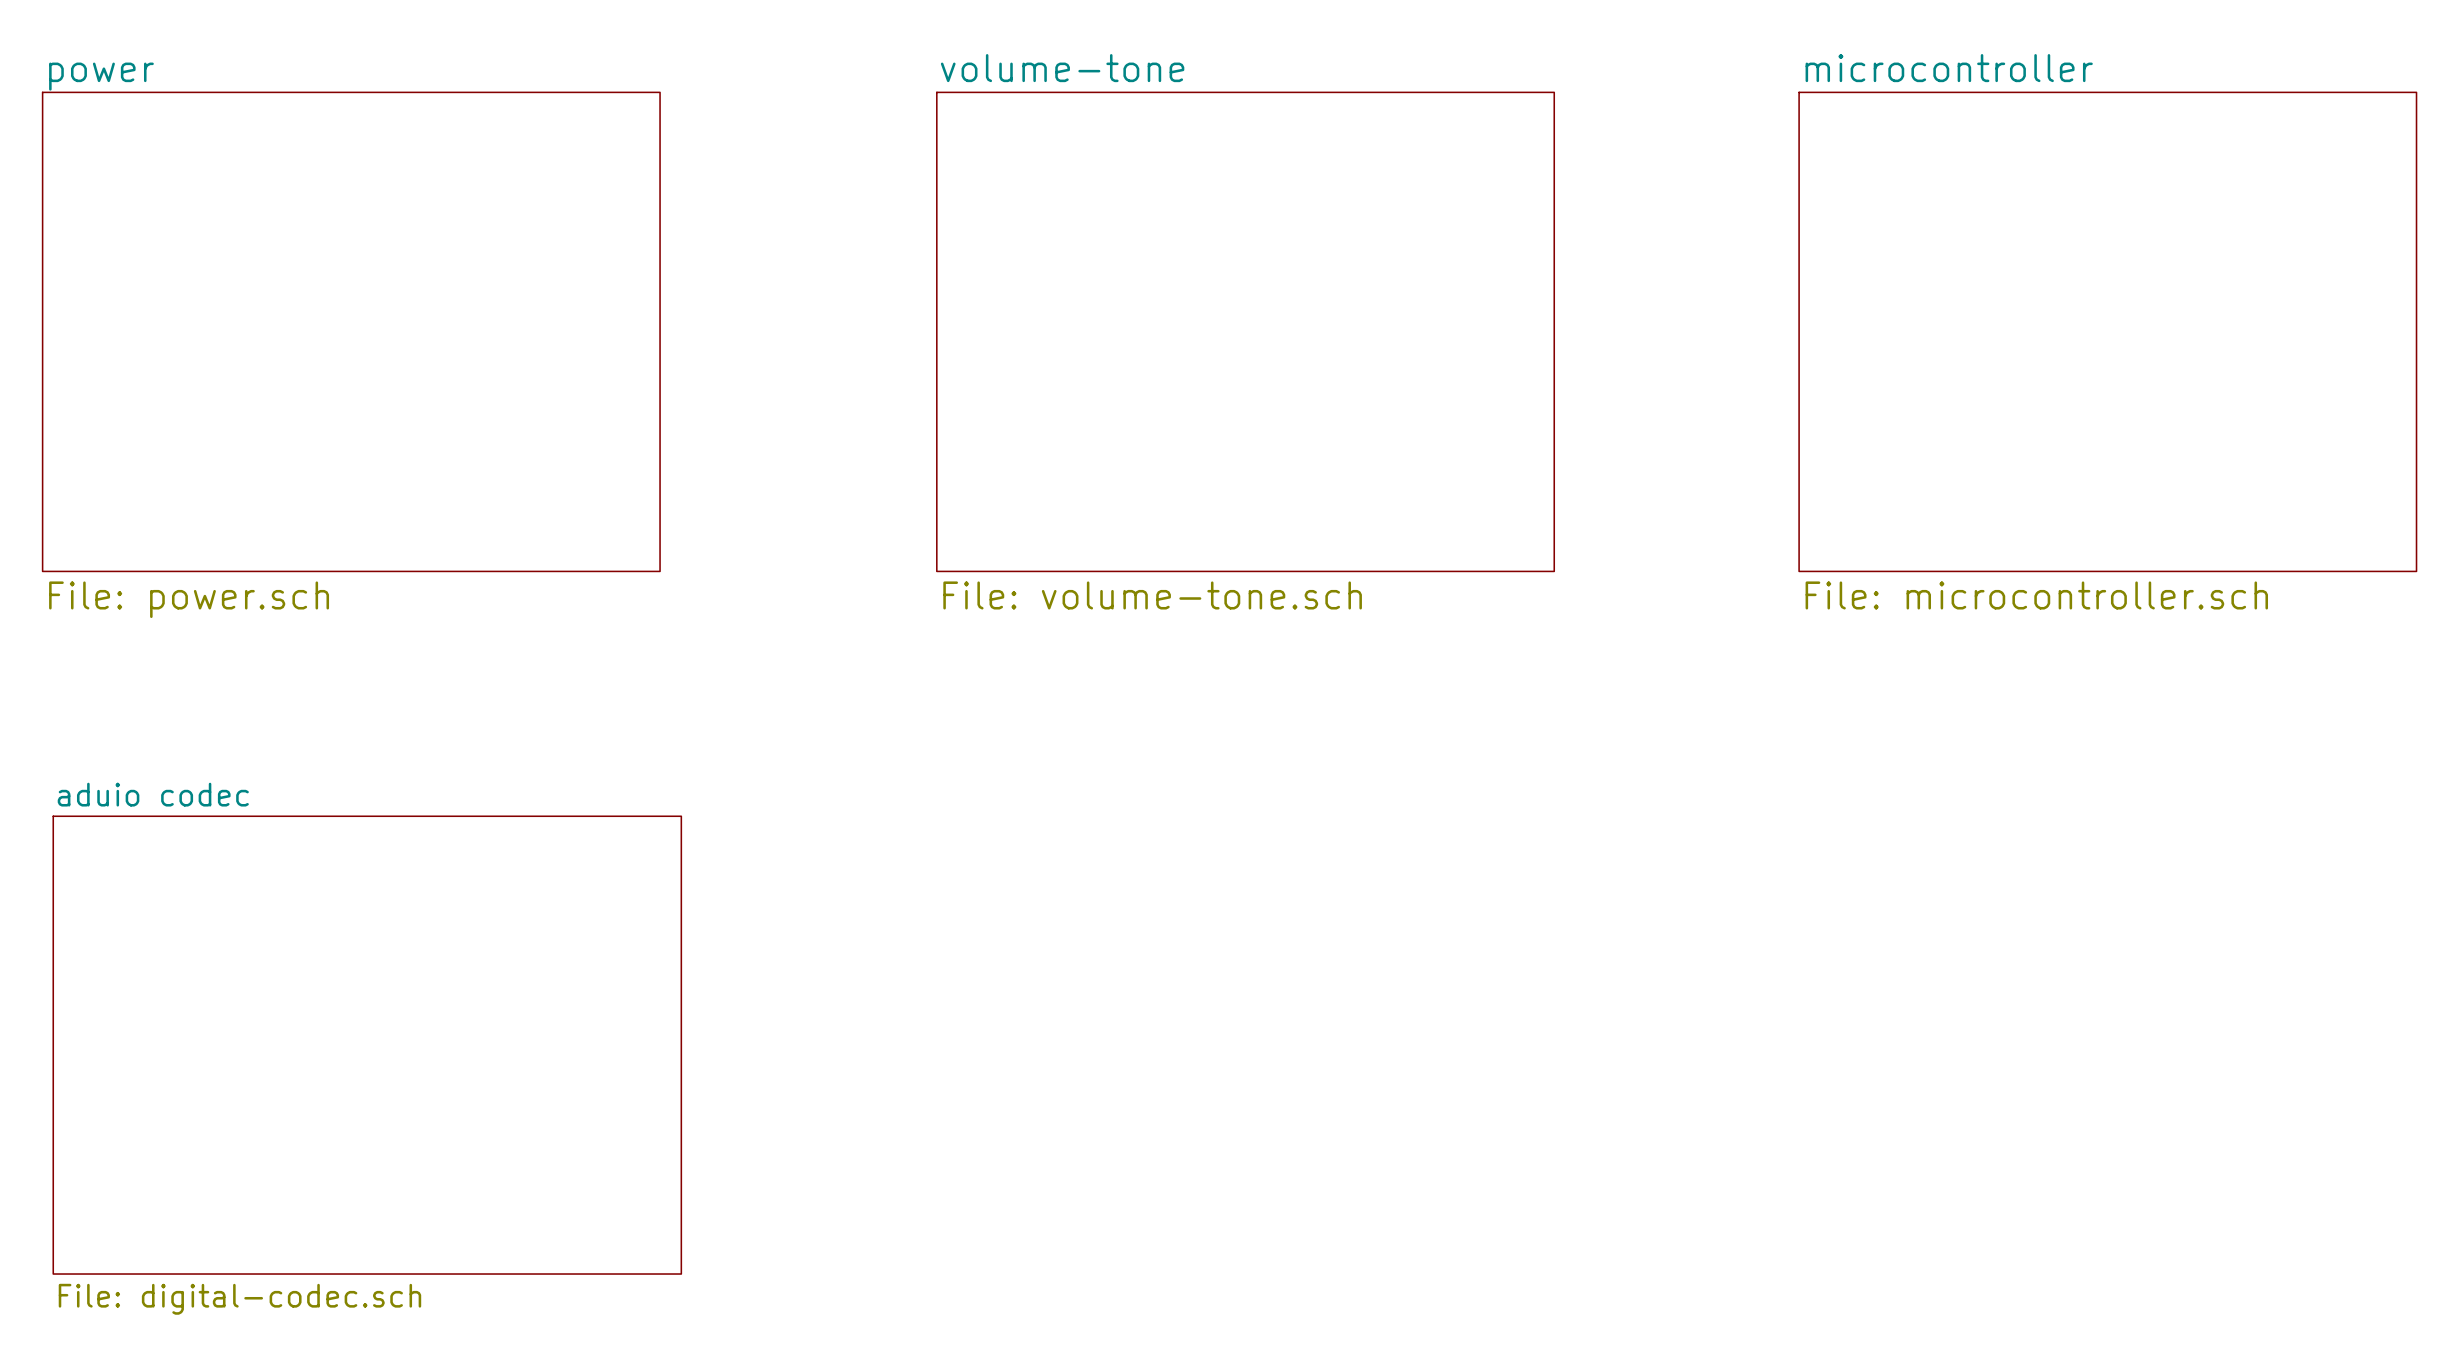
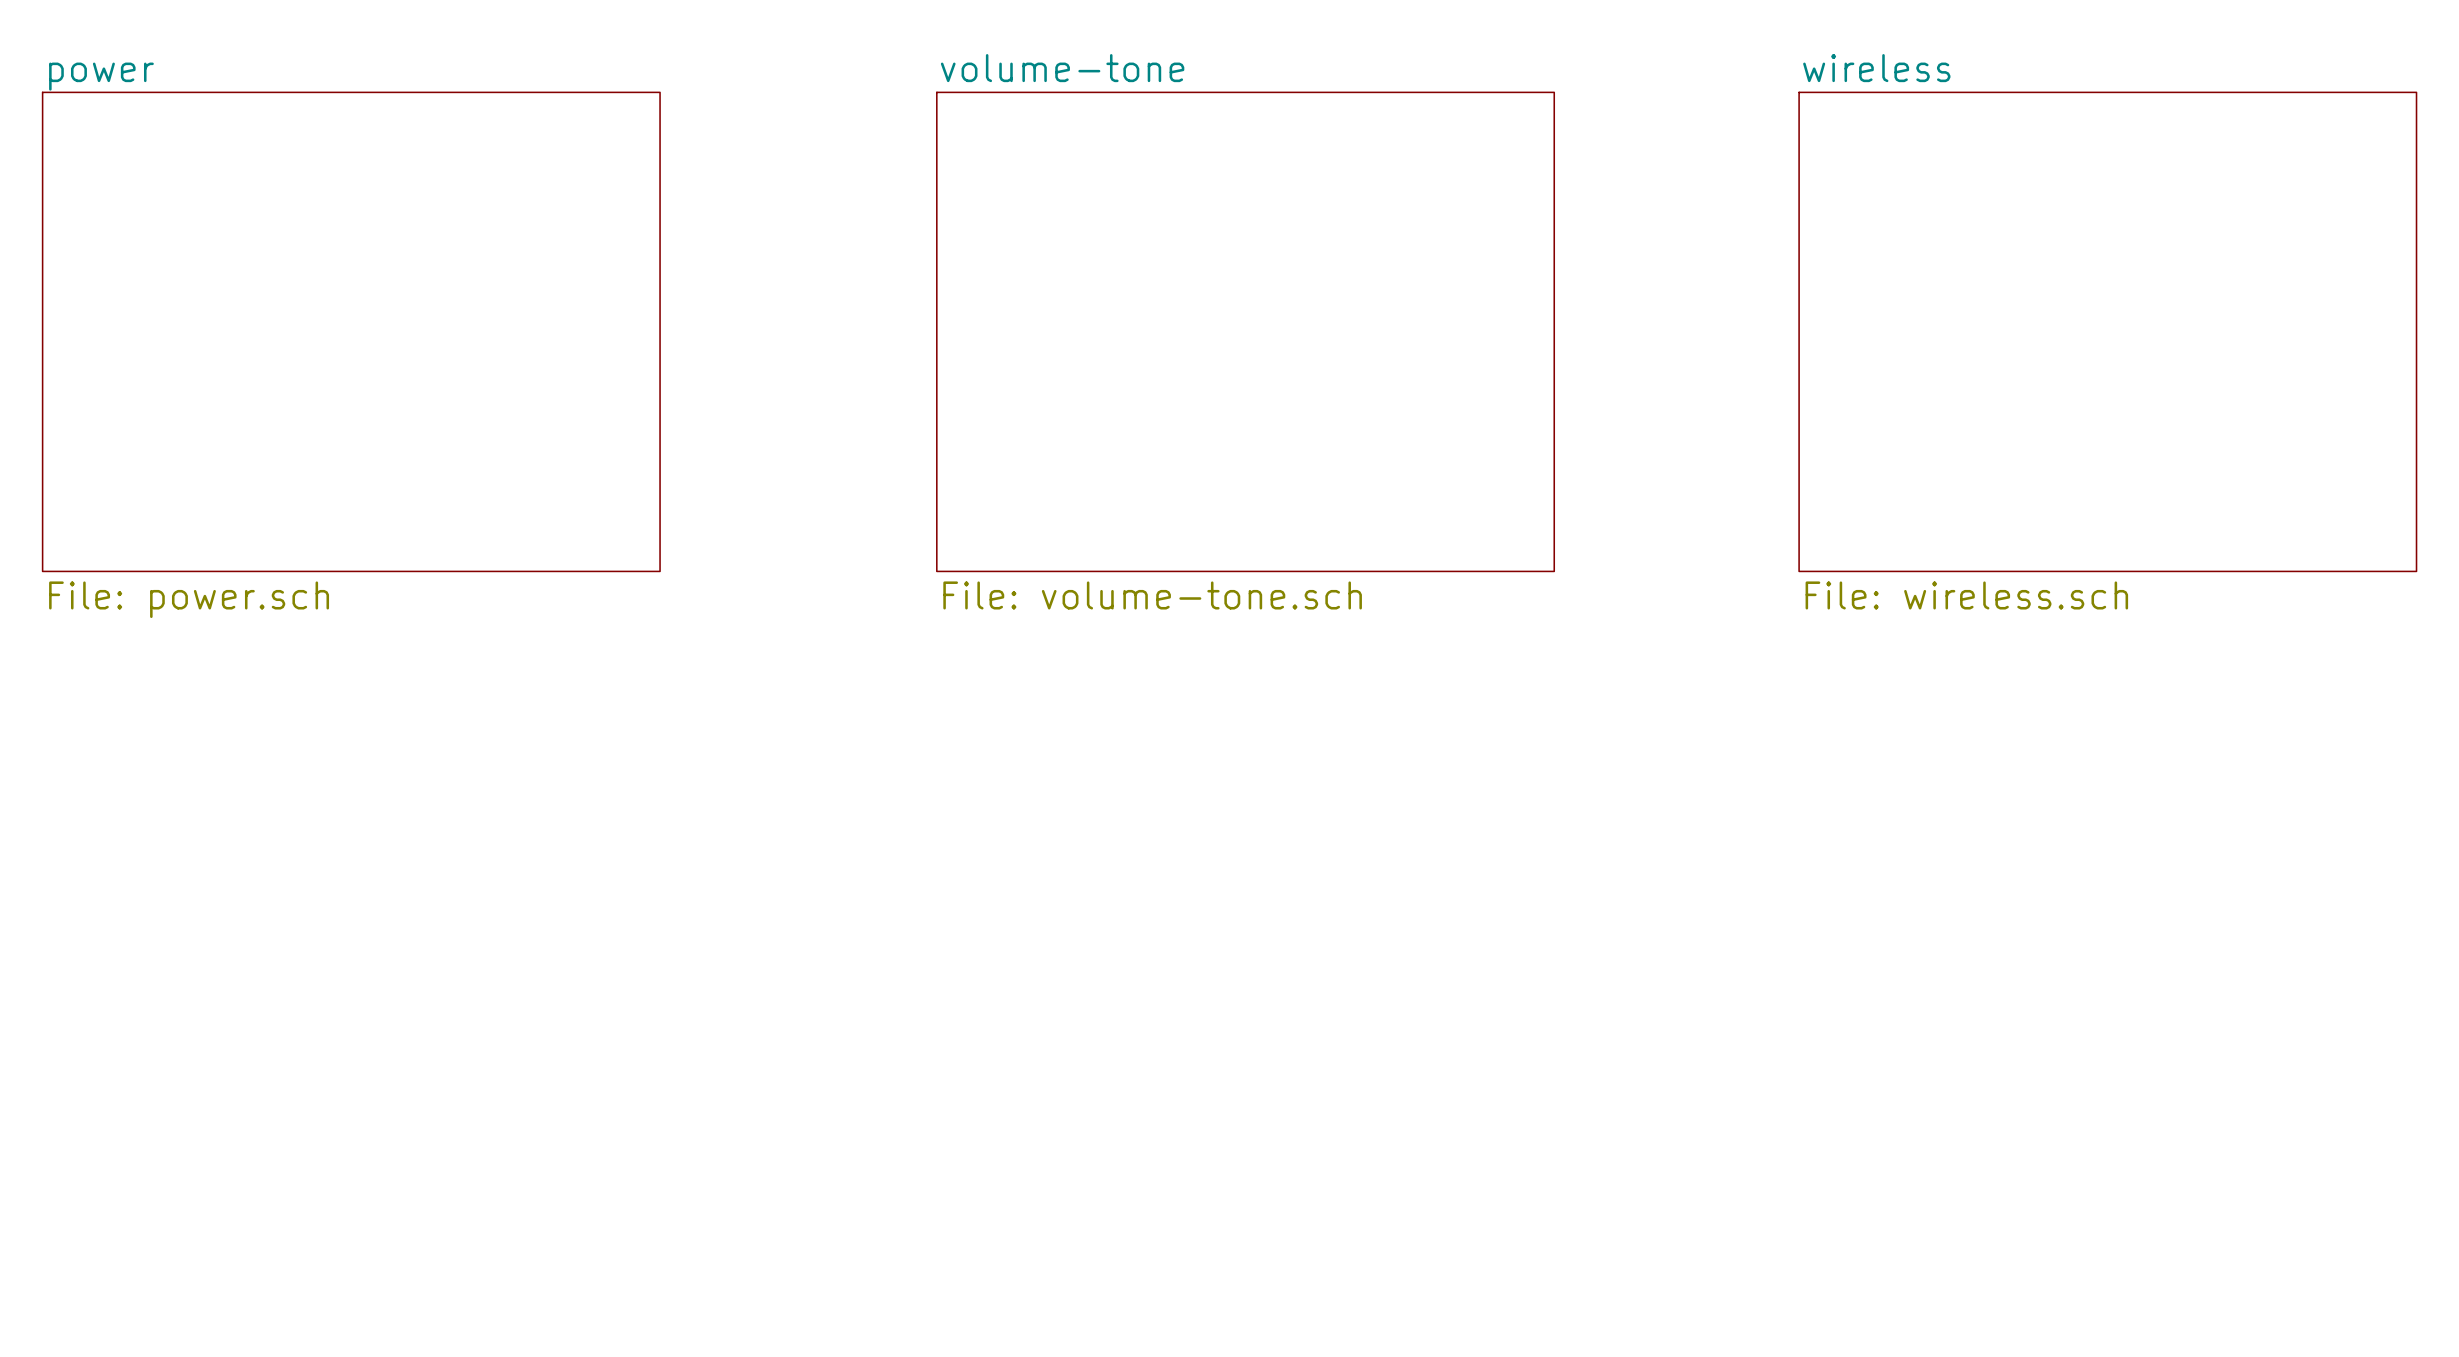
sheet microcontroller name: microcontroller (1949, 68) -> wireless (1876, 68)
sheet microcontroller value: File: microcontroller.sch (2036, 595) -> File: wireless.sch (1966, 595)
sheet aduio codec: File: digital-codec.sch (367, 1045) -> none

